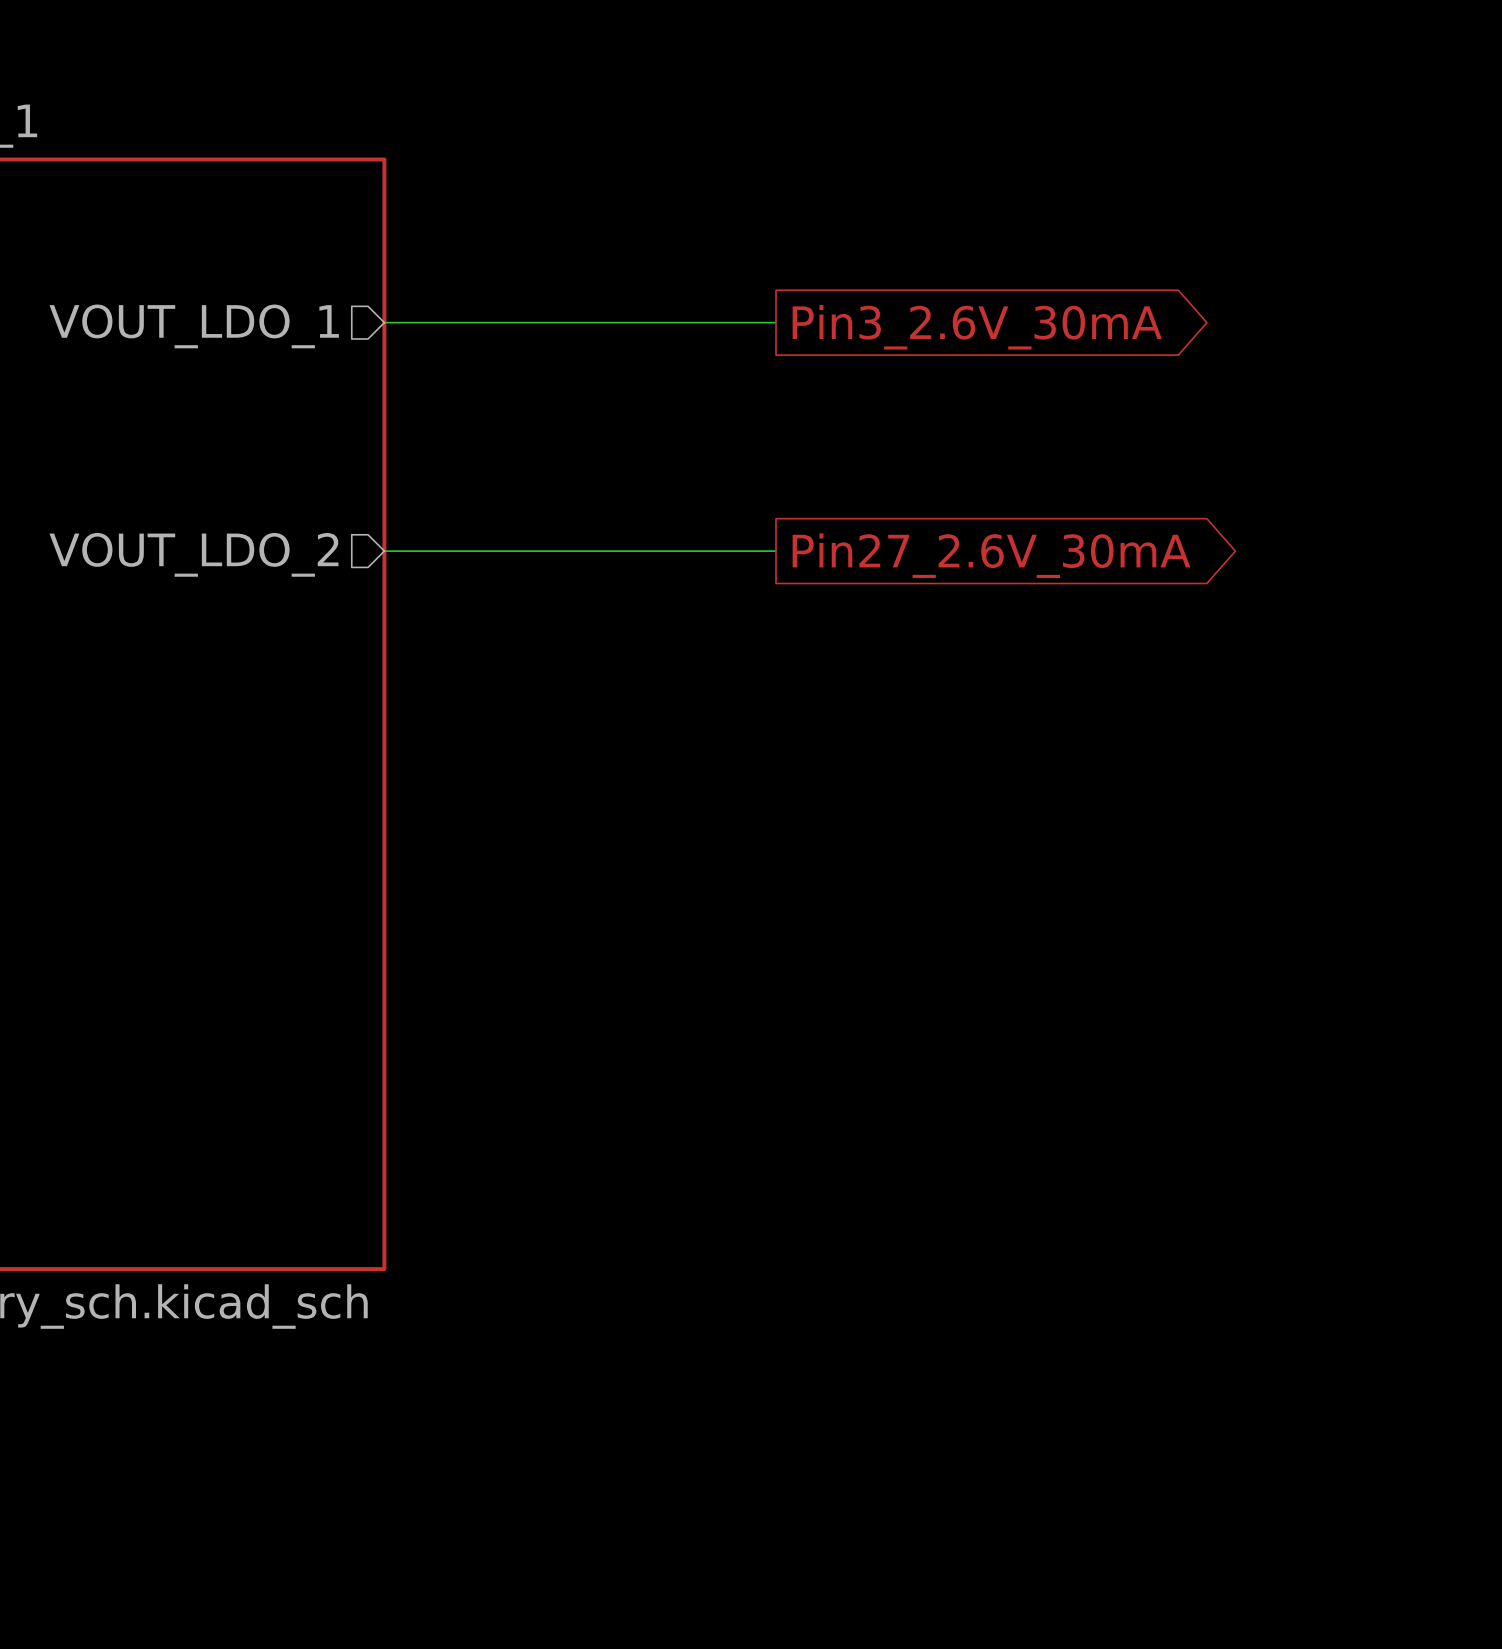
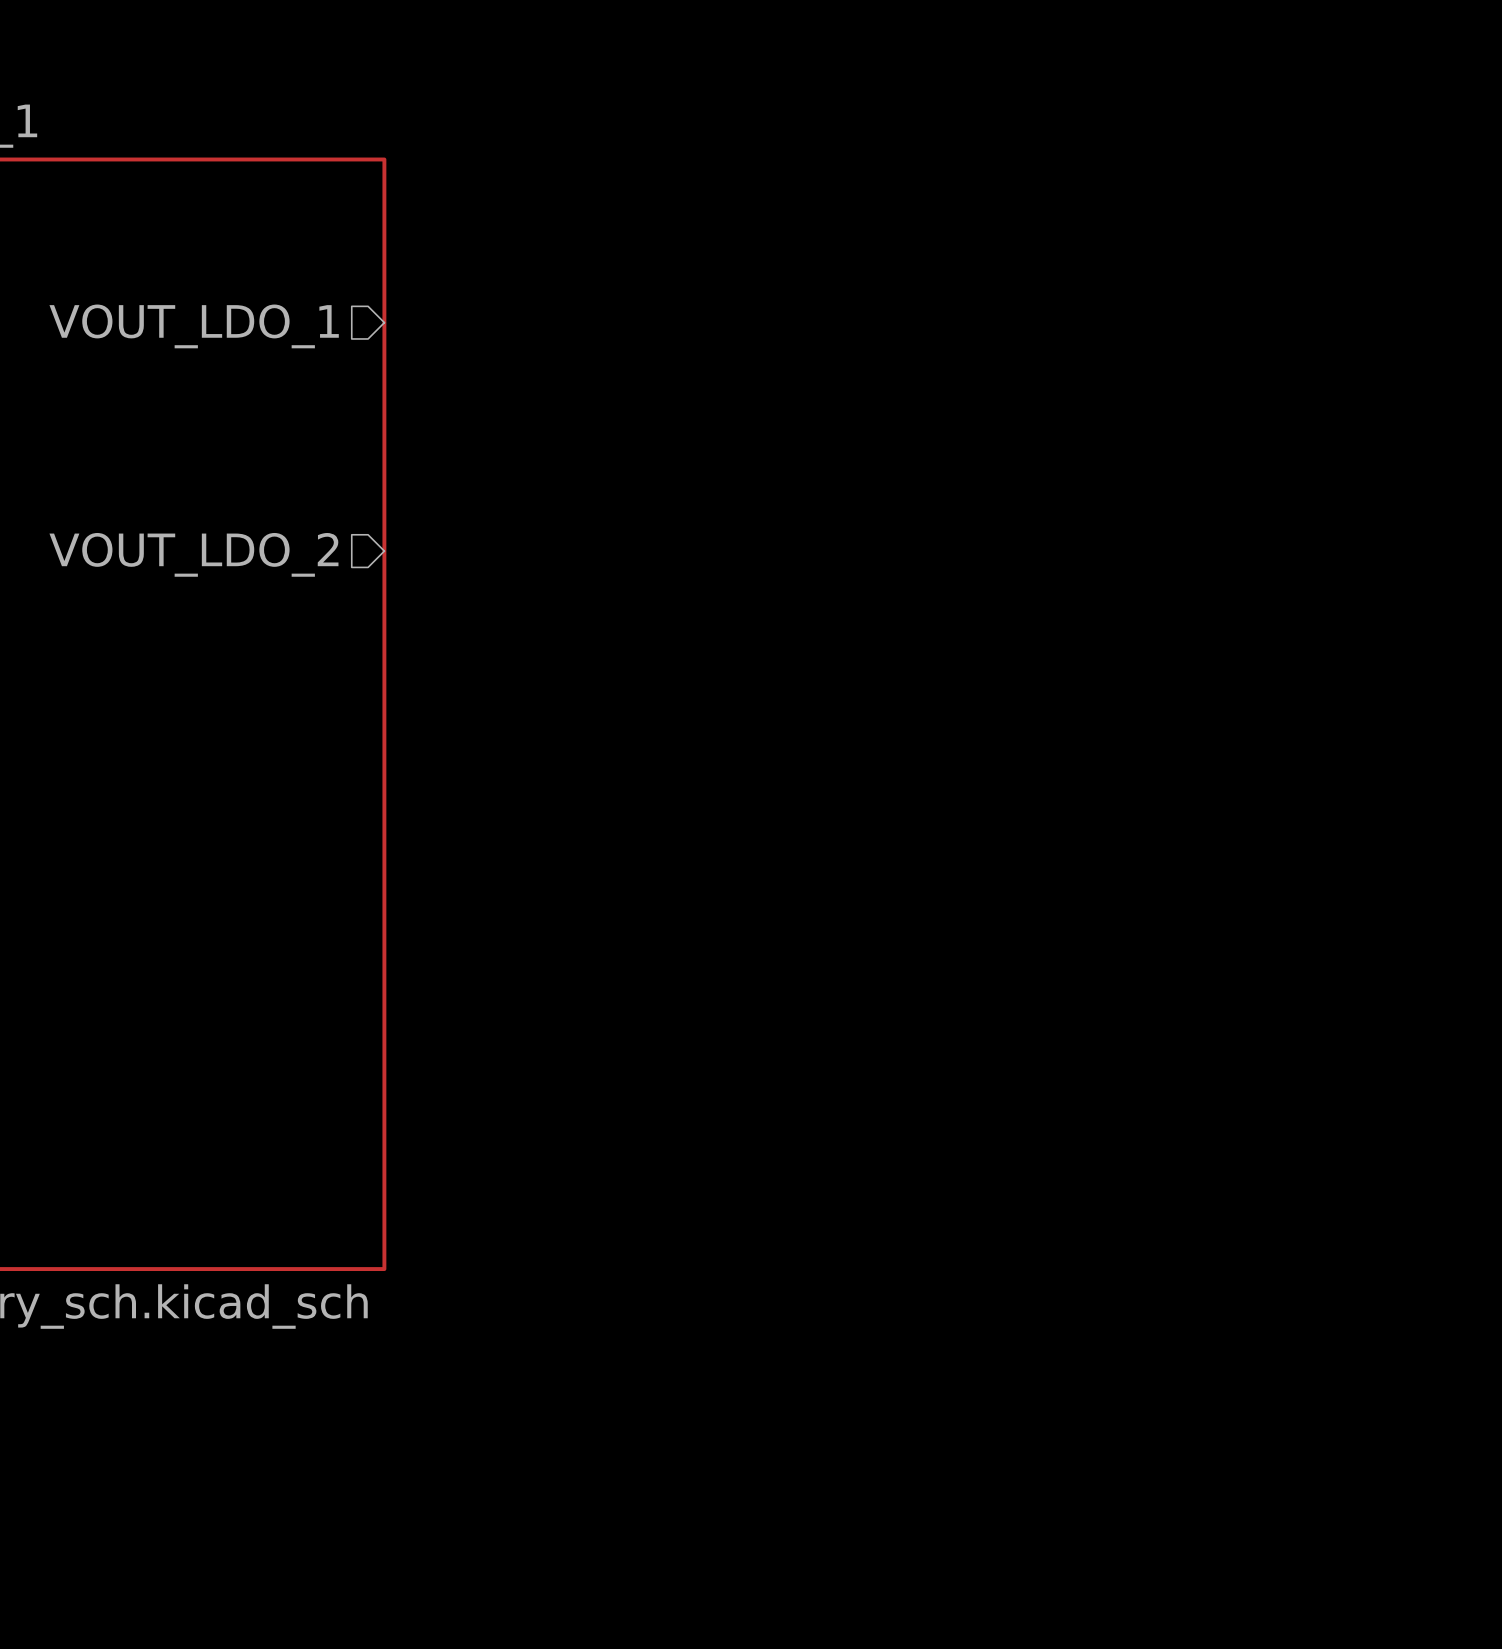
wire: (384, 322) (776, 322) -> none
global label: Pin3_2.6V_30mA (977, 327) -> none
wire: (384, 551) (776, 551) -> none
global label: Pin27_2.6V_30mA (991, 555) -> none

